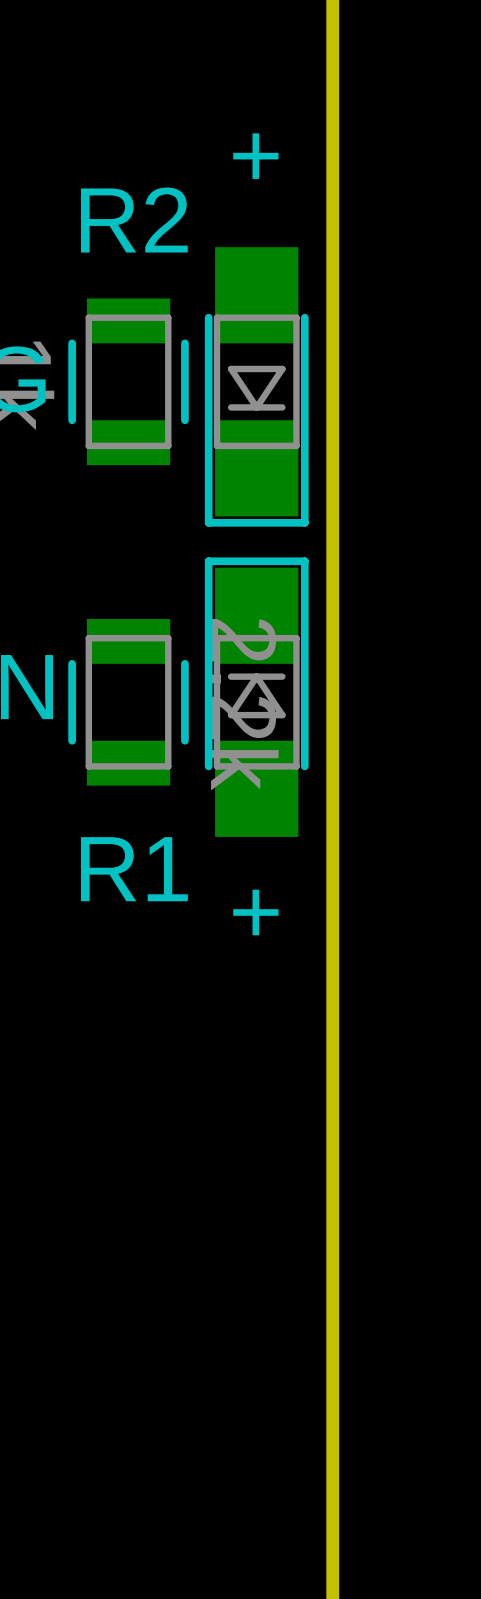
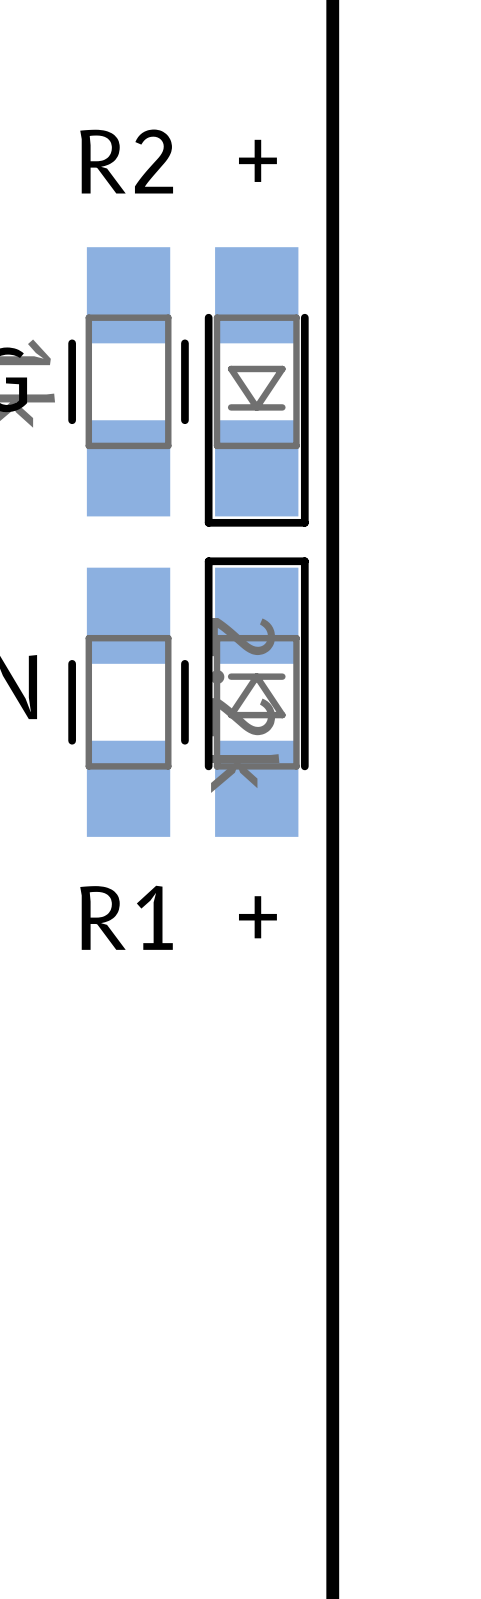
R2 name position: R2 (134, 220) -> R2 (126, 161)
R2 footprint: [68, 298, 189, 466] -> [68, 247, 189, 517]
R1 footprint: [68, 618, 189, 786] -> [68, 567, 189, 837]
R1 name position: R1 (134, 869) -> R1 (126, 917)

